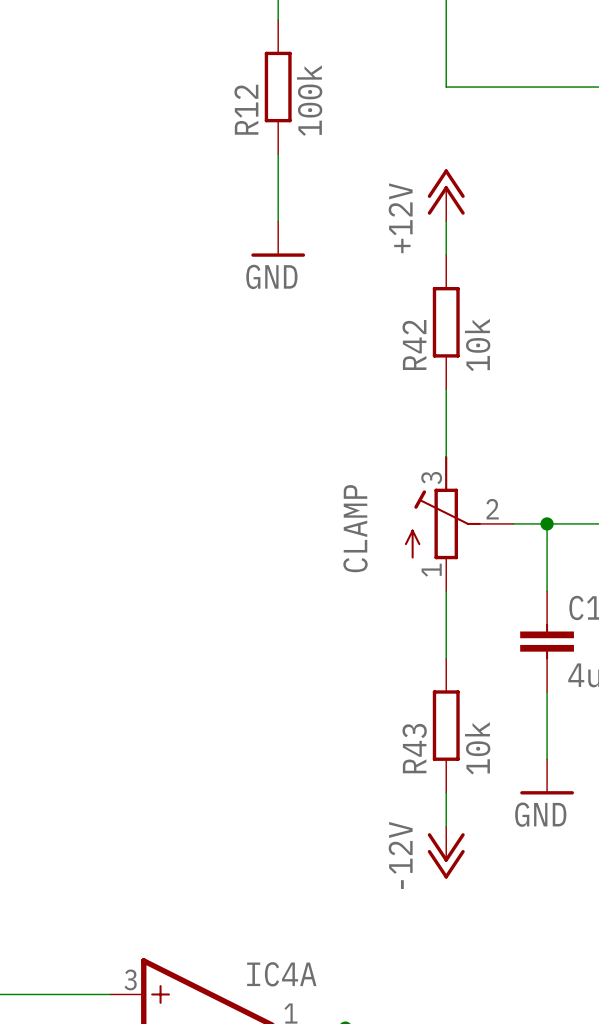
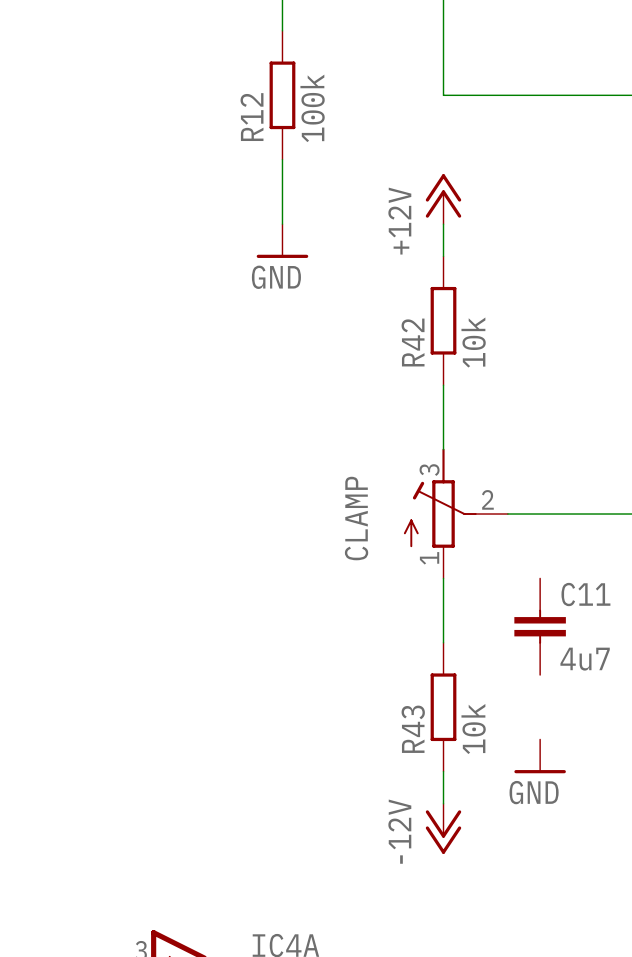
wire: (547, 523) (547, 591) -> none
junction: (547, 523) -> none
wire: (547, 691) (547, 759) -> none

